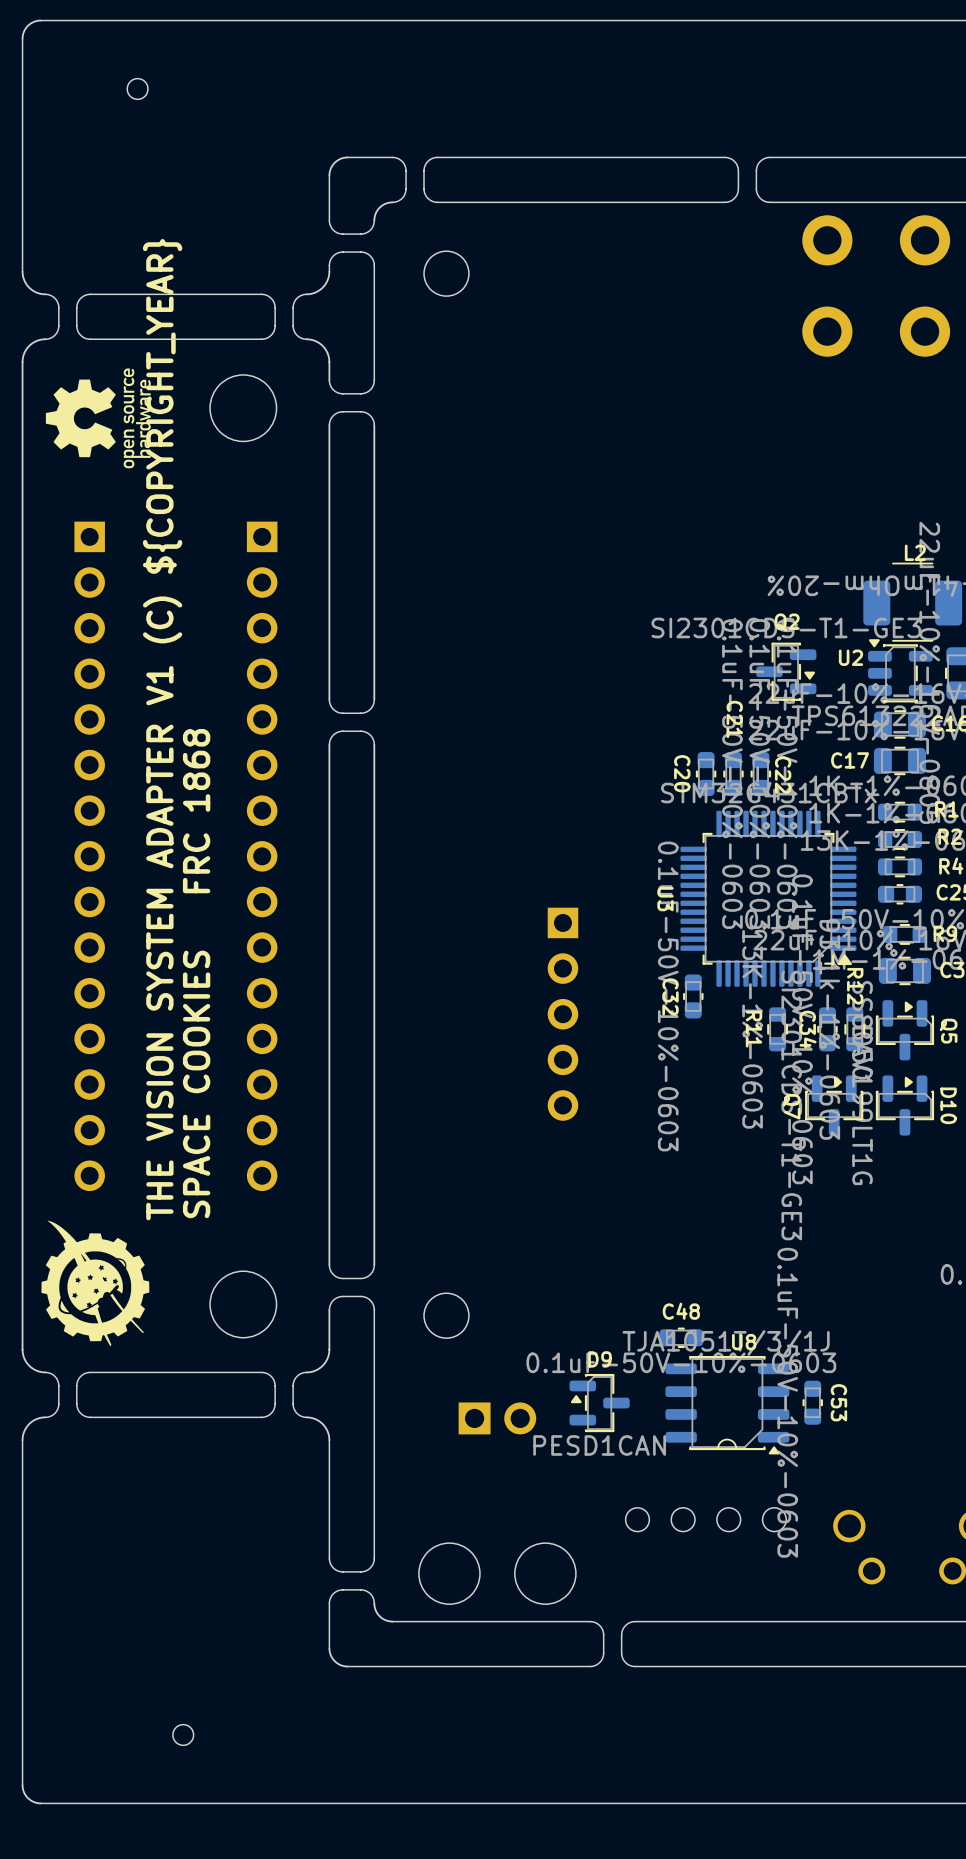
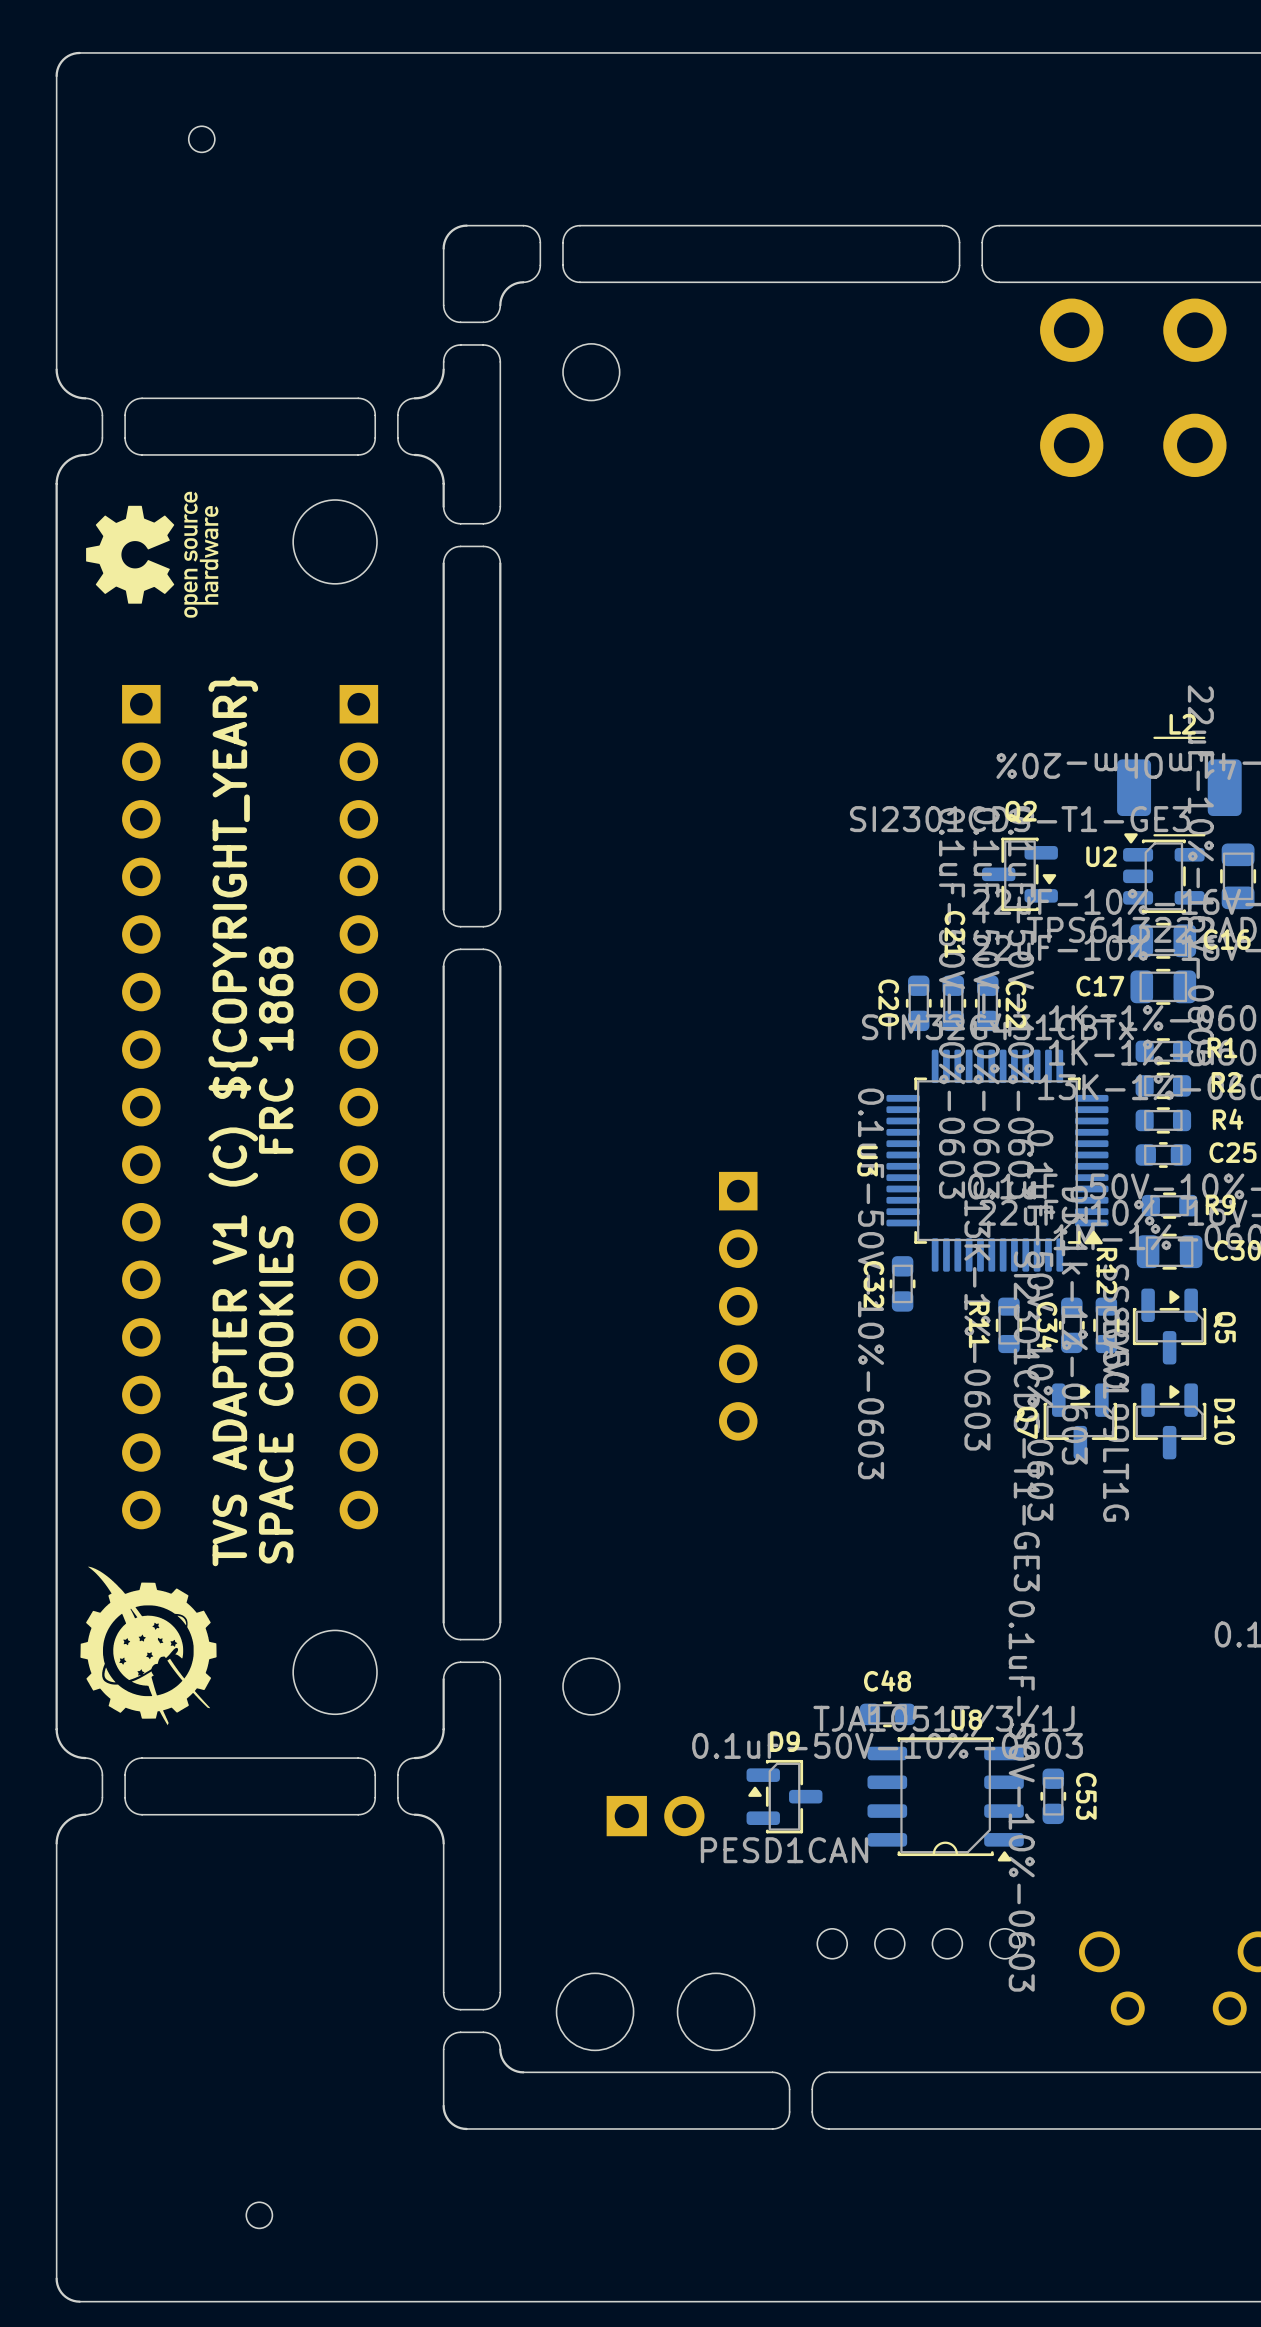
text: THE VISION SYSTEM ADAPTER V1 (C) ${COPYRIGHT_YEAR} (162, 729) -> TVS ADAPTER V1 (C) ${COPYRIGHT_YEAR} (233, 1121)

